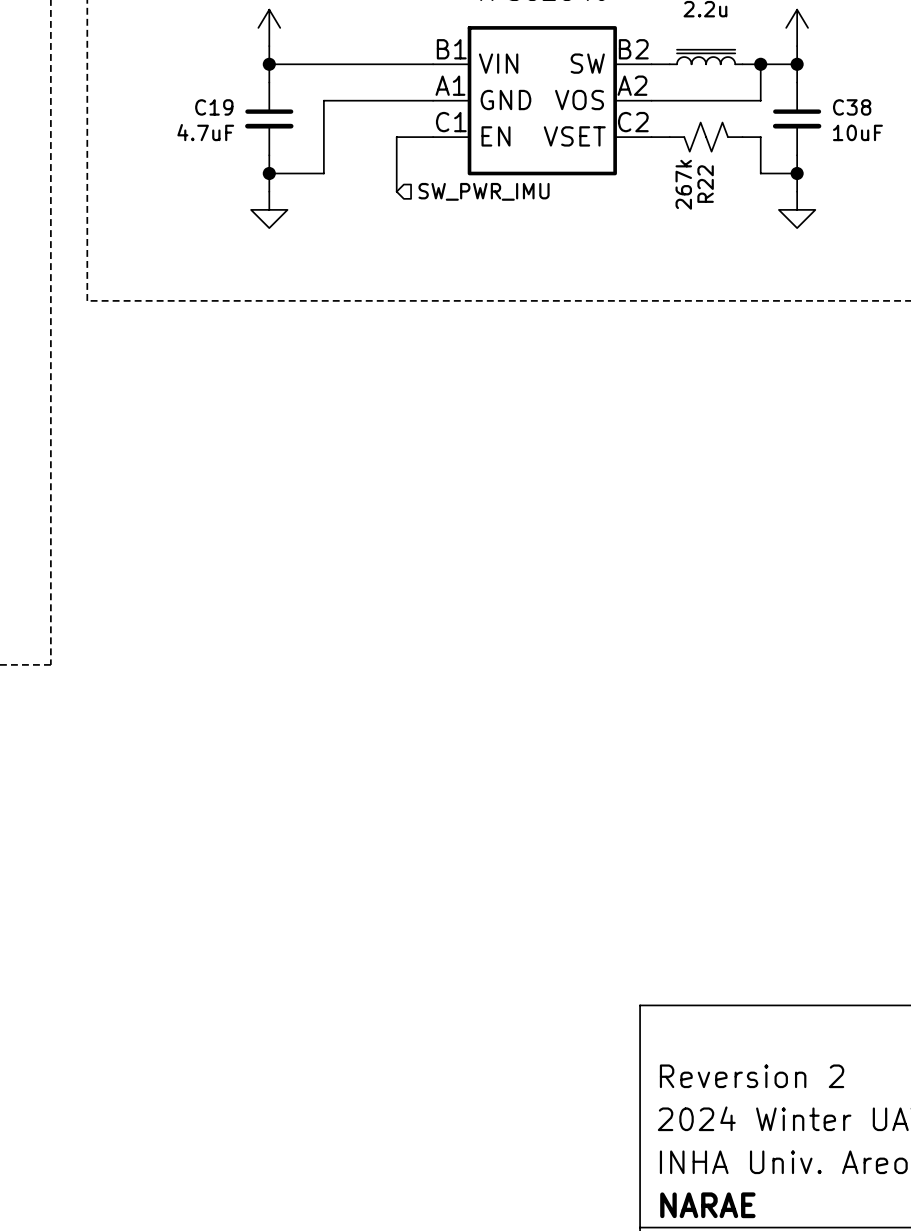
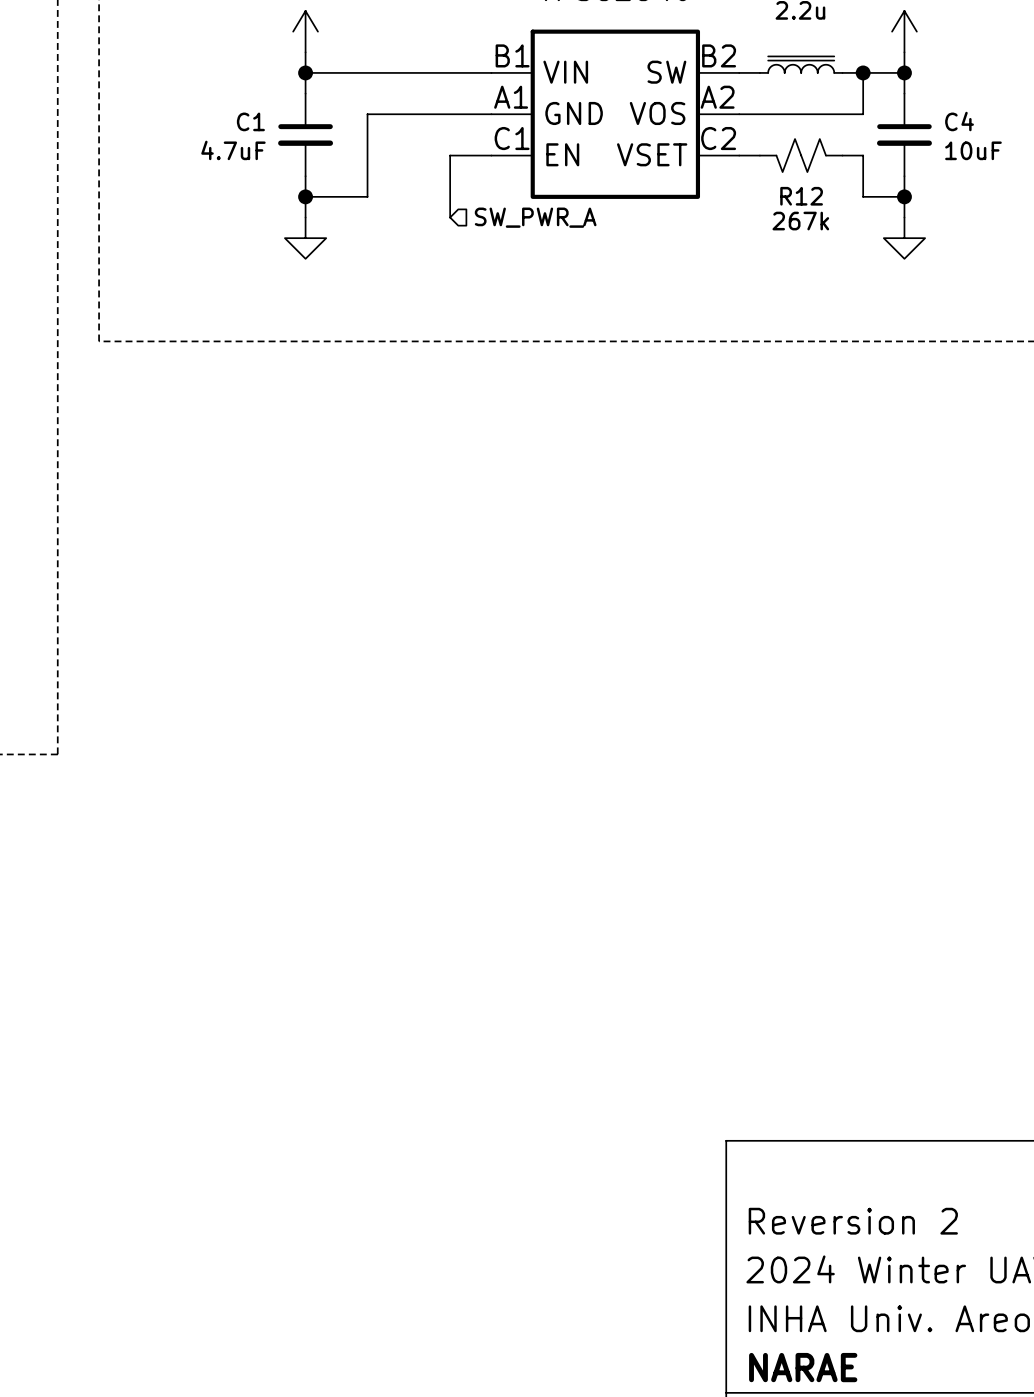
C19 name: C19 (214, 107) -> C1 (250, 121)
C38 name: C38 (852, 107) -> C4 (959, 121)
R22 value rotation: 0° (683, 184) -> 90° clockwise (800, 221)
R22 name: R22 (705, 184) -> R12 (801, 196)
hierarchical label: SW_PWR_IMU (484, 191) -> SW_PWR_A (535, 217)

